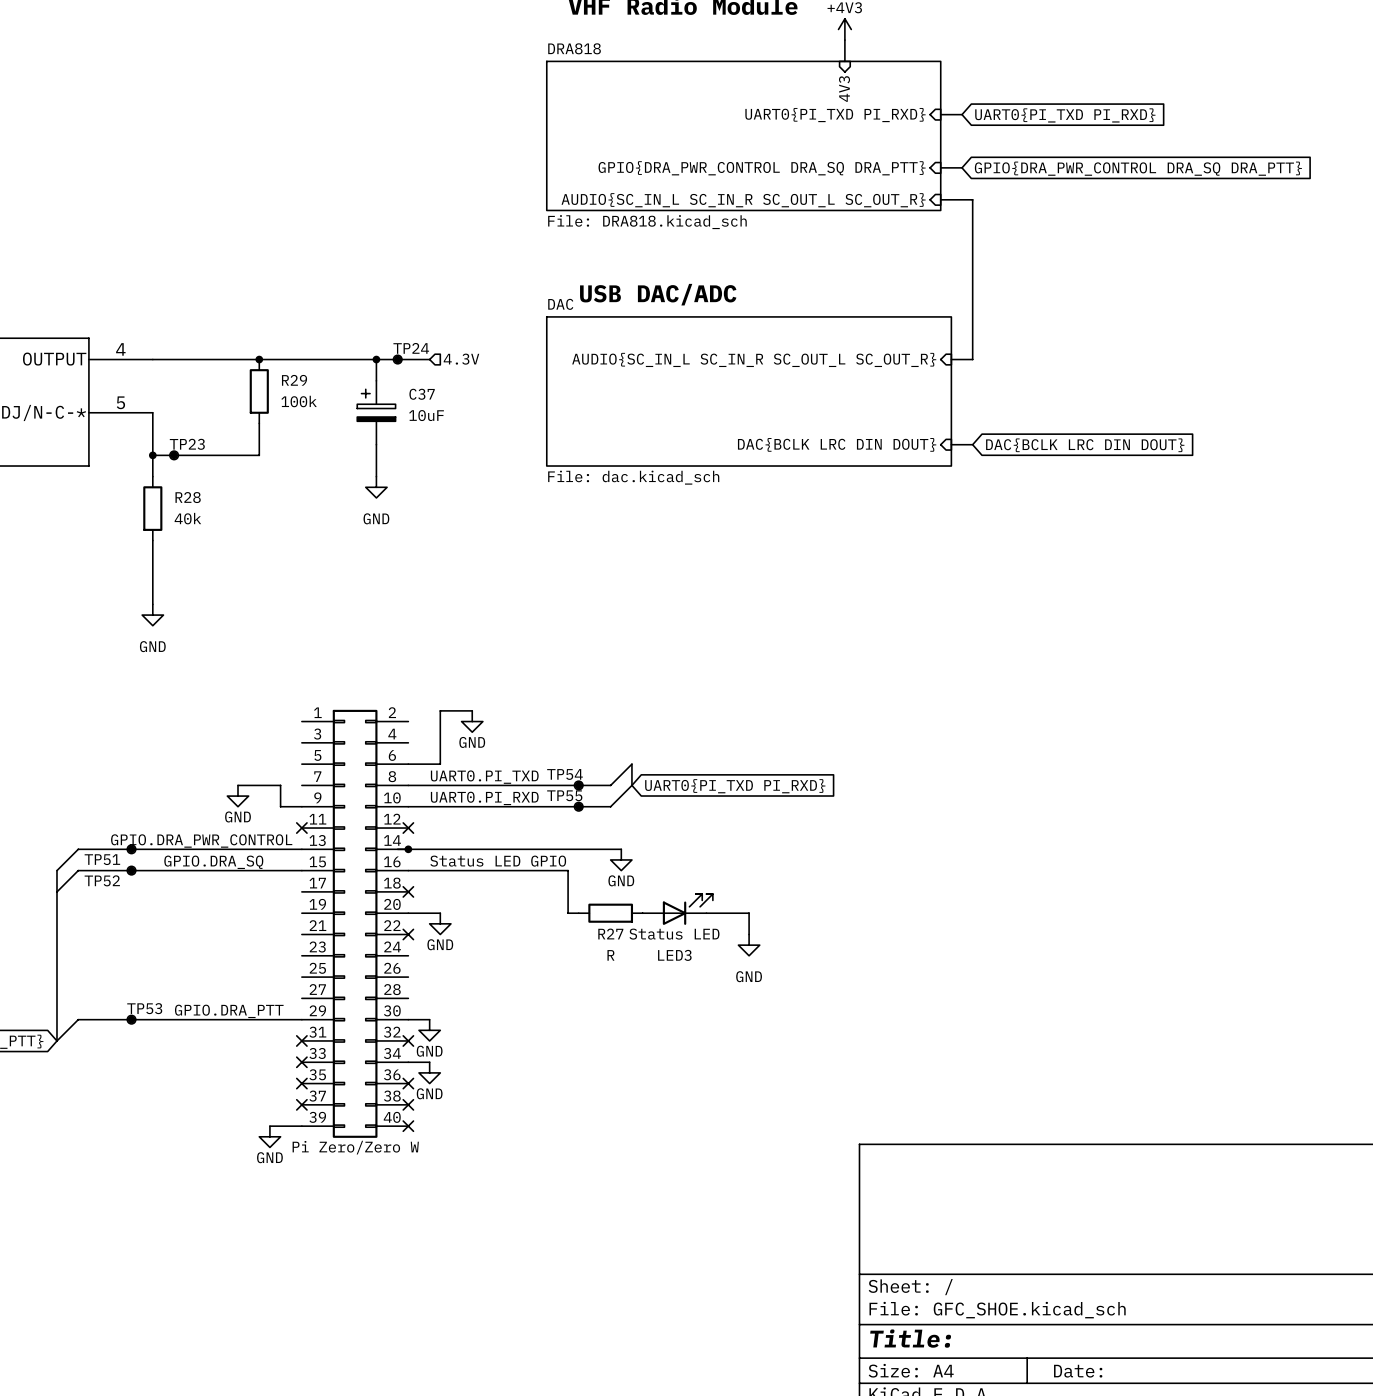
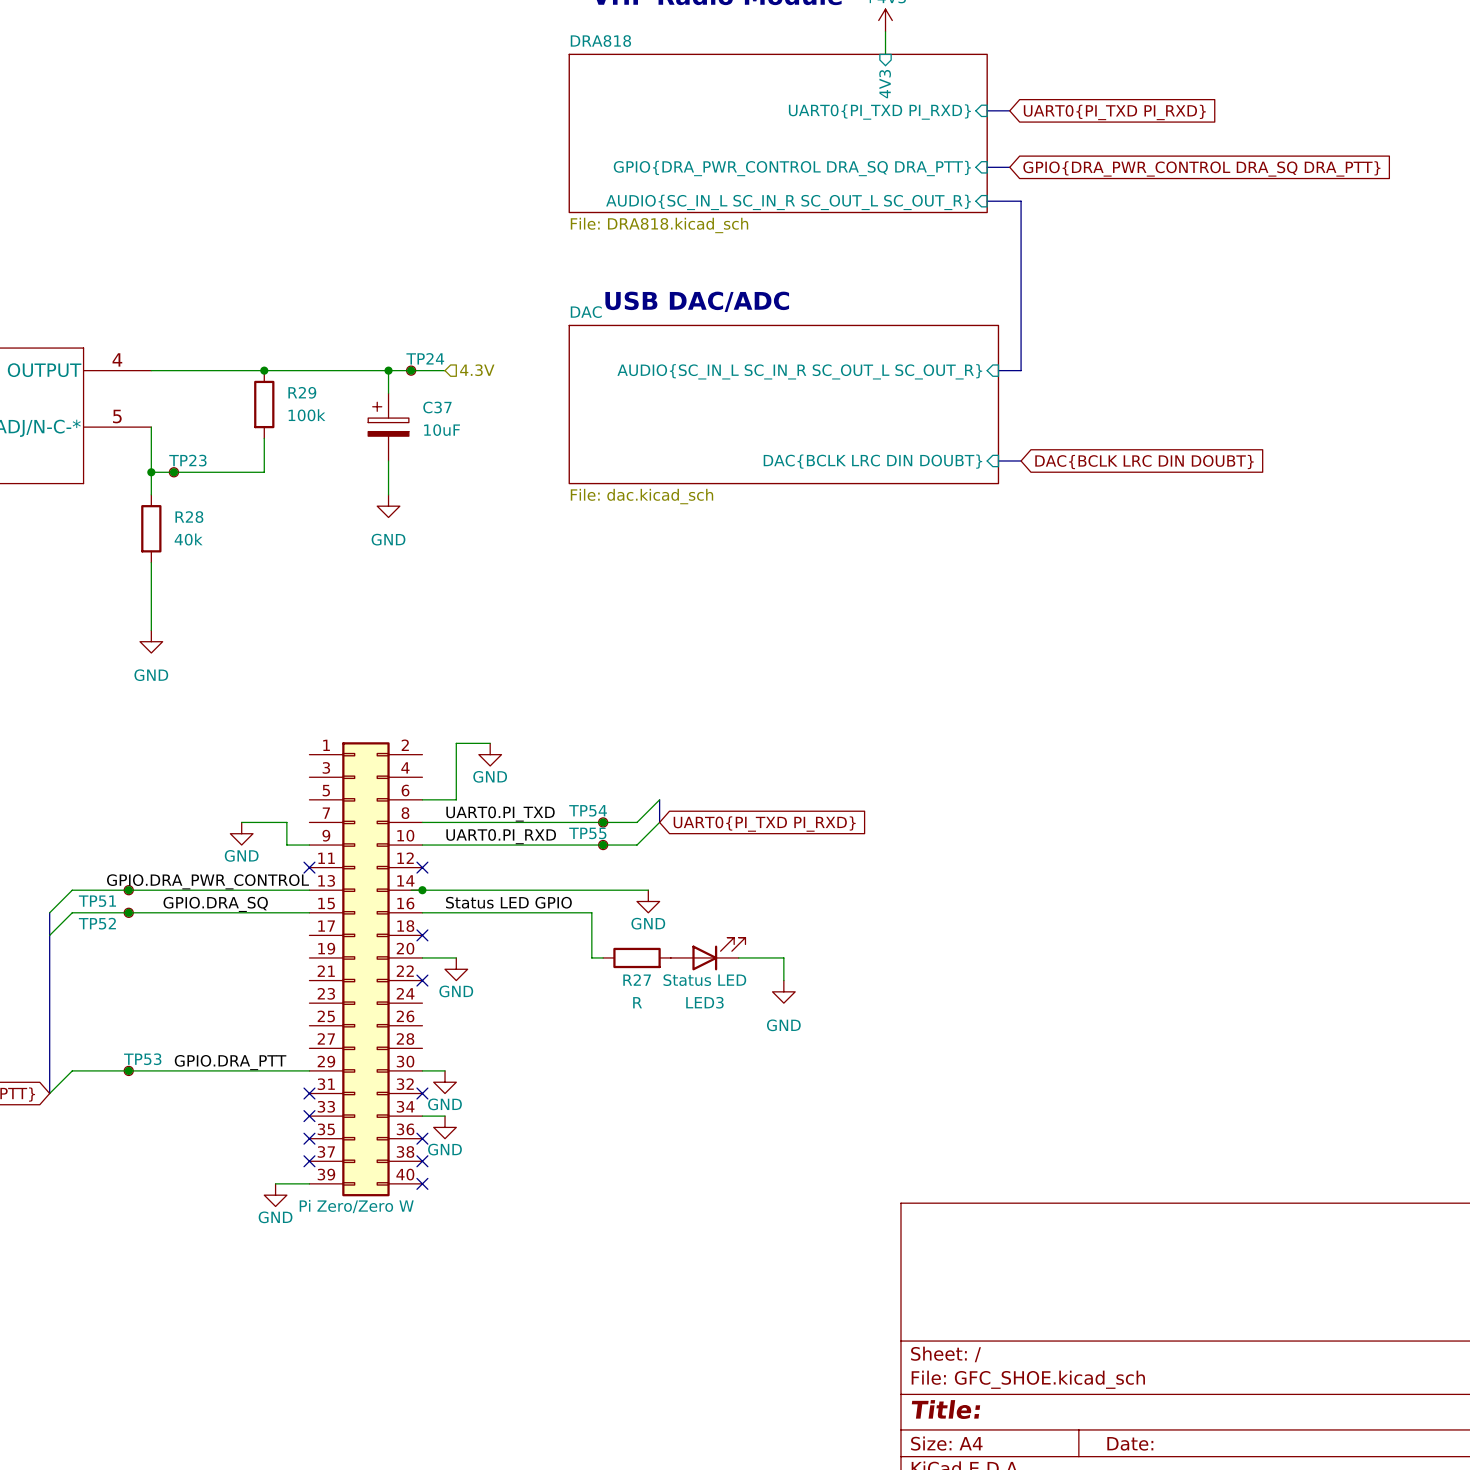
sheet pin: DAC{BCLK LRC DIN DOUT} (837, 444) -> DAC{BCLK LRC DIN DOUBT} (872, 461)
global label: DAC{BCLK LRC DIN DOUT} (1085, 445) -> DAC{BCLK LRC DIN DOUBT} (1144, 462)

